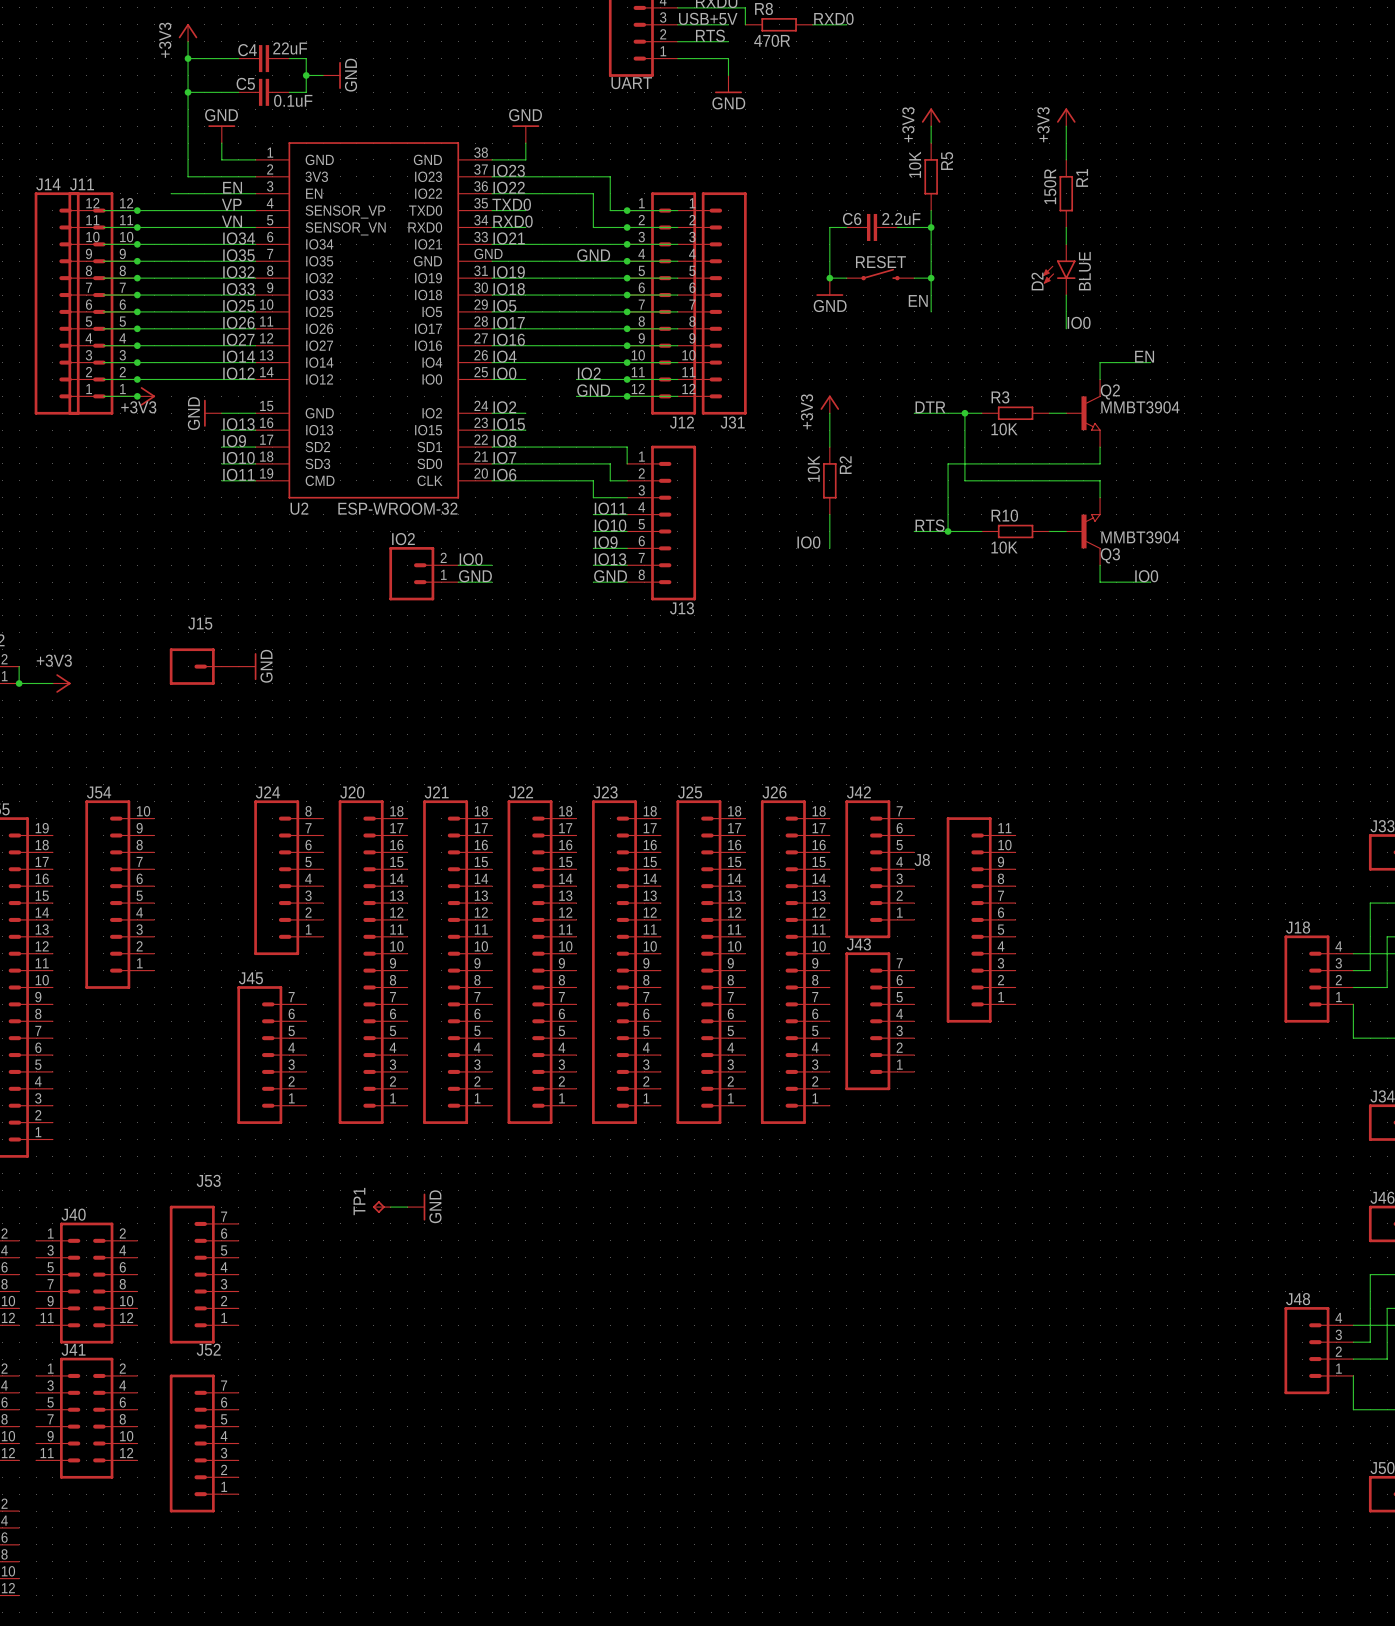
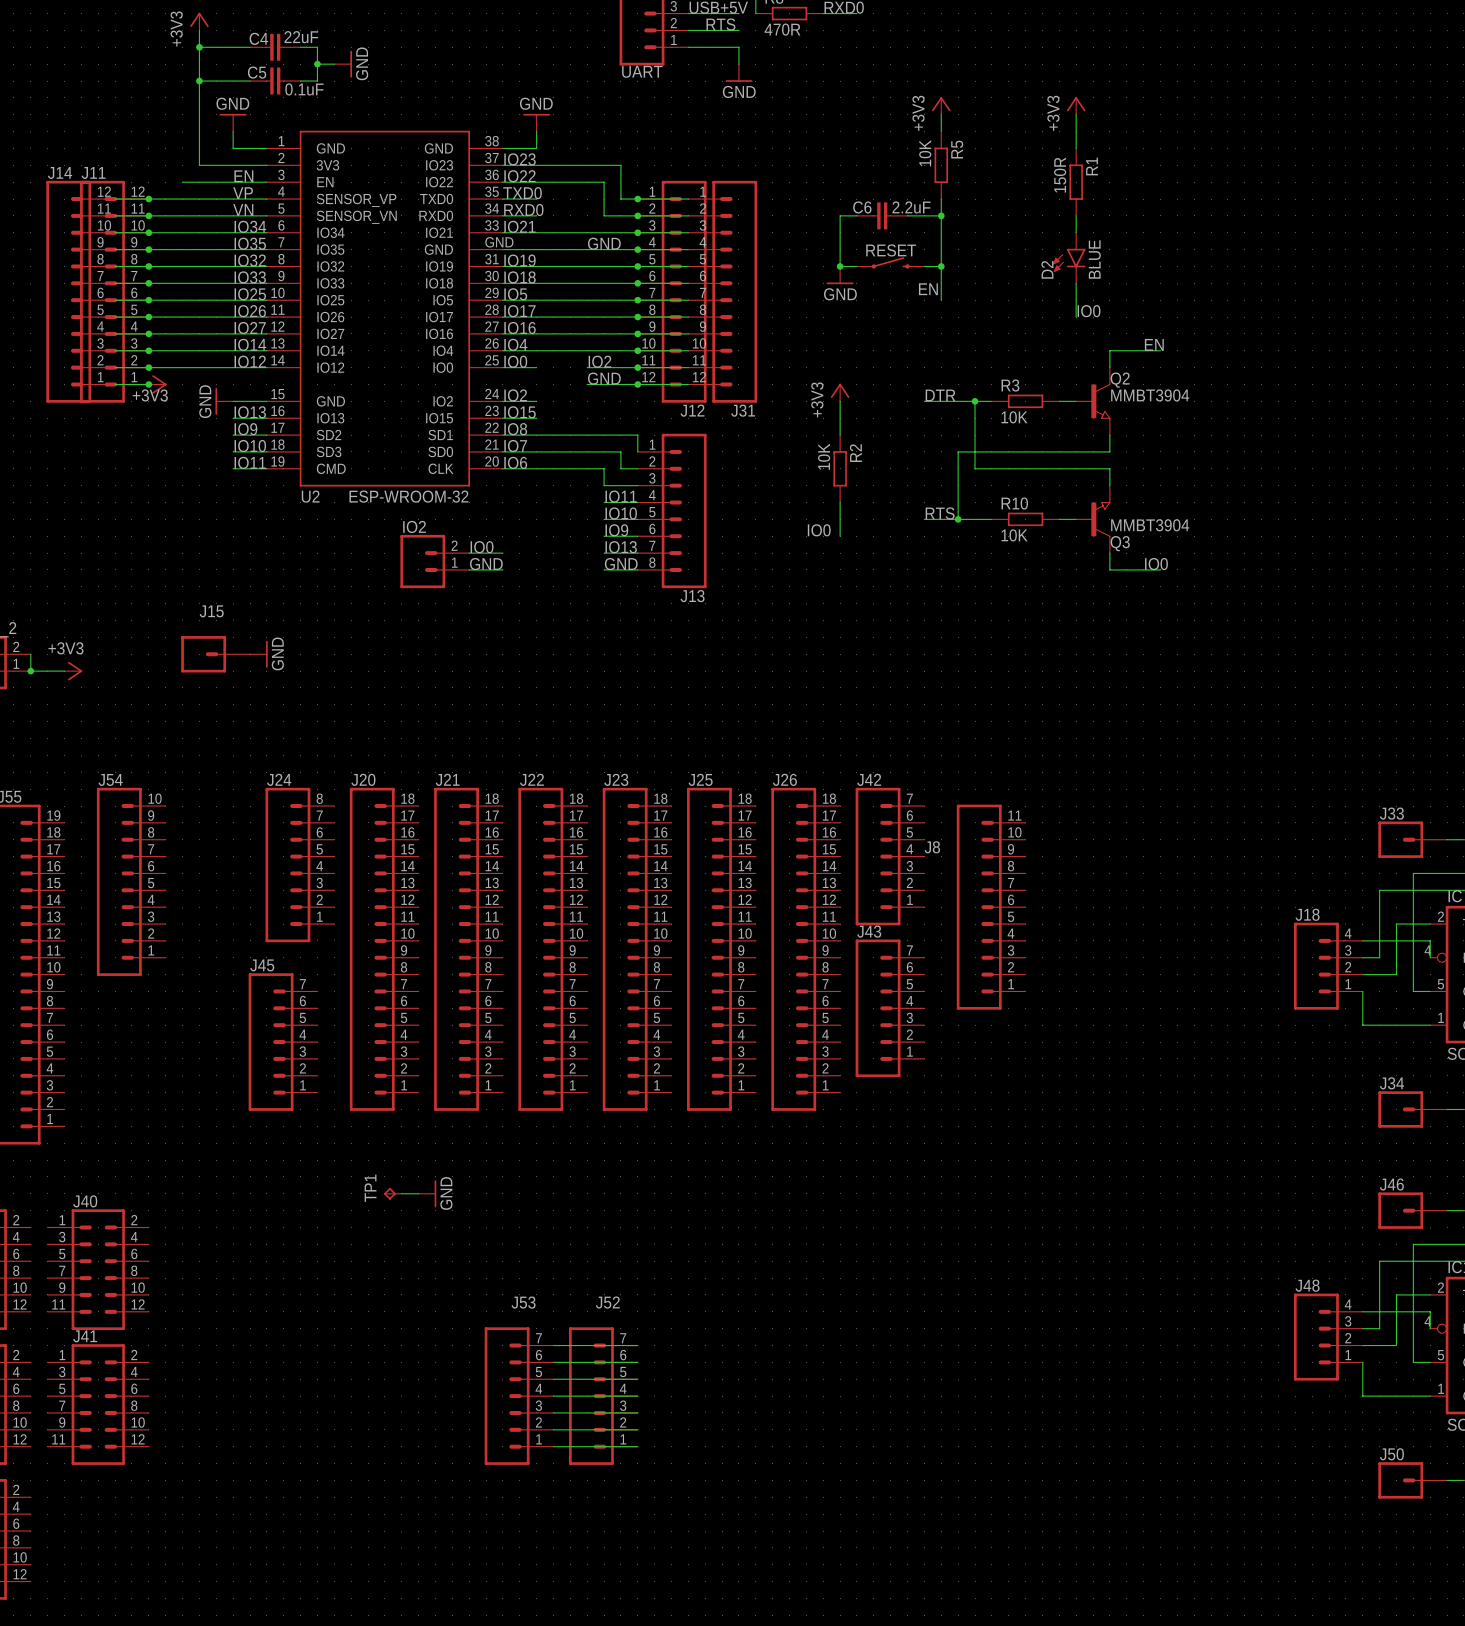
J53 position: (204, 1274) -> (519, 1396)
wire: none -> (553, 1345) (637, 1345)
wire: none -> (553, 1362) (637, 1362)
wire: none -> (553, 1379) (637, 1379)
wire: none -> (553, 1396) (637, 1396)
wire: none -> (553, 1412) (637, 1412)
J52 position: (204, 1443) -> (603, 1396)
wire: none -> (553, 1429) (637, 1429)
wire: none -> (553, 1446) (637, 1446)

